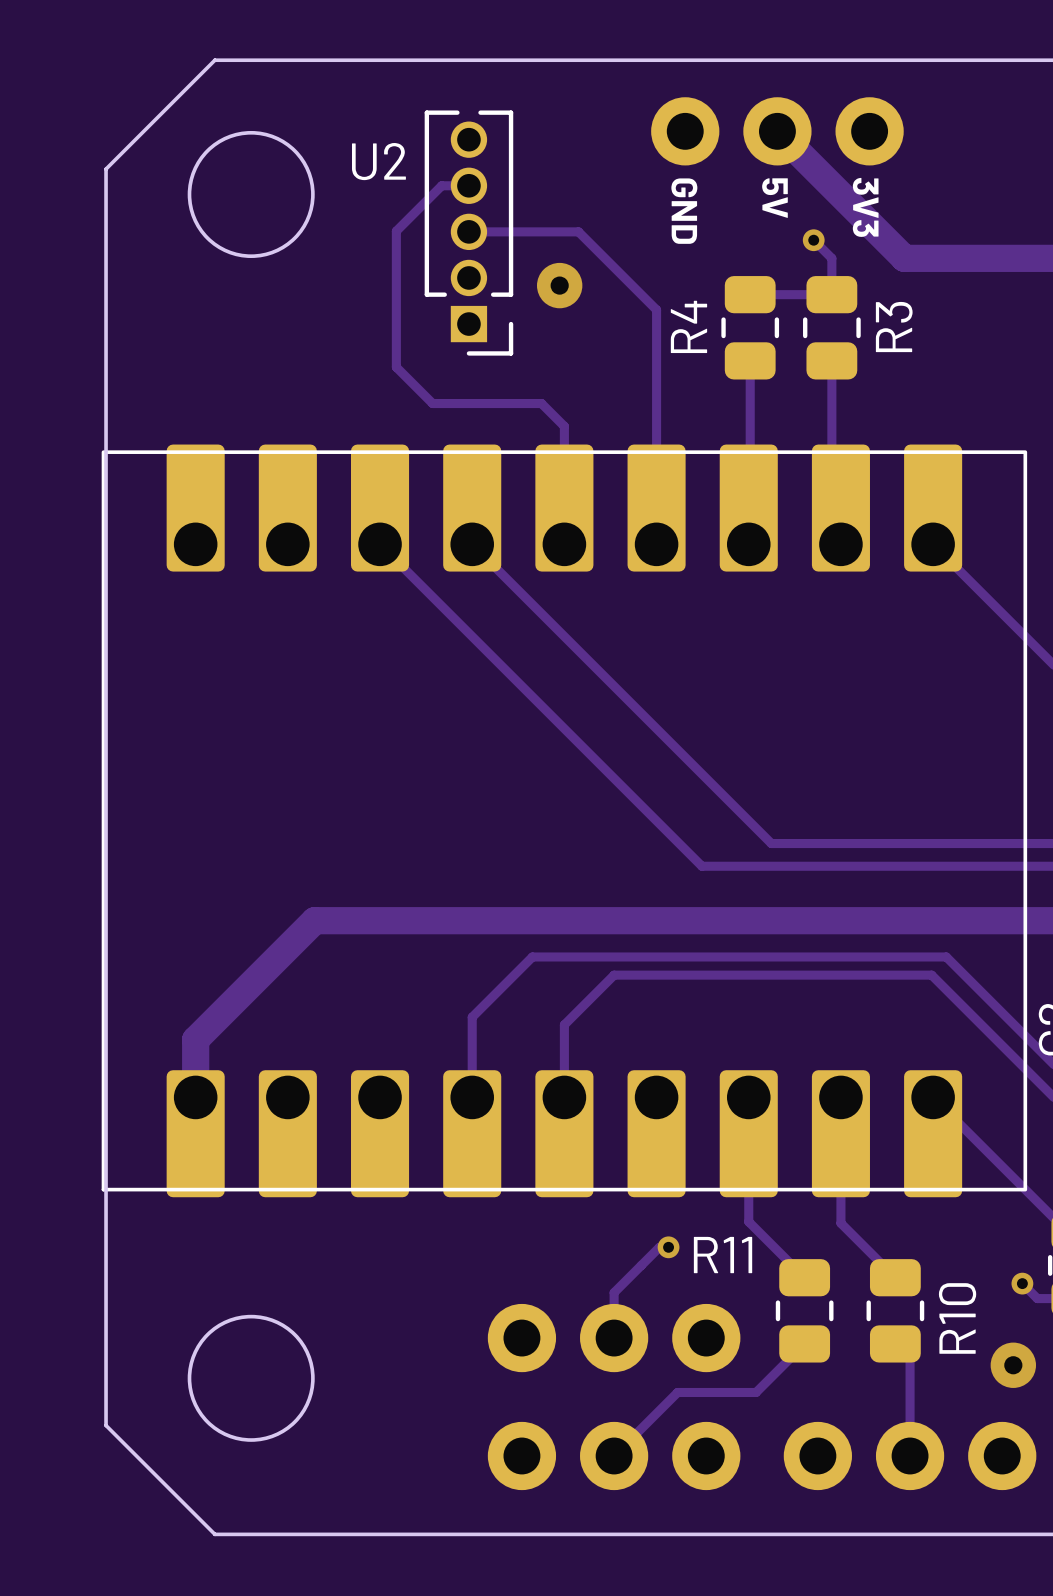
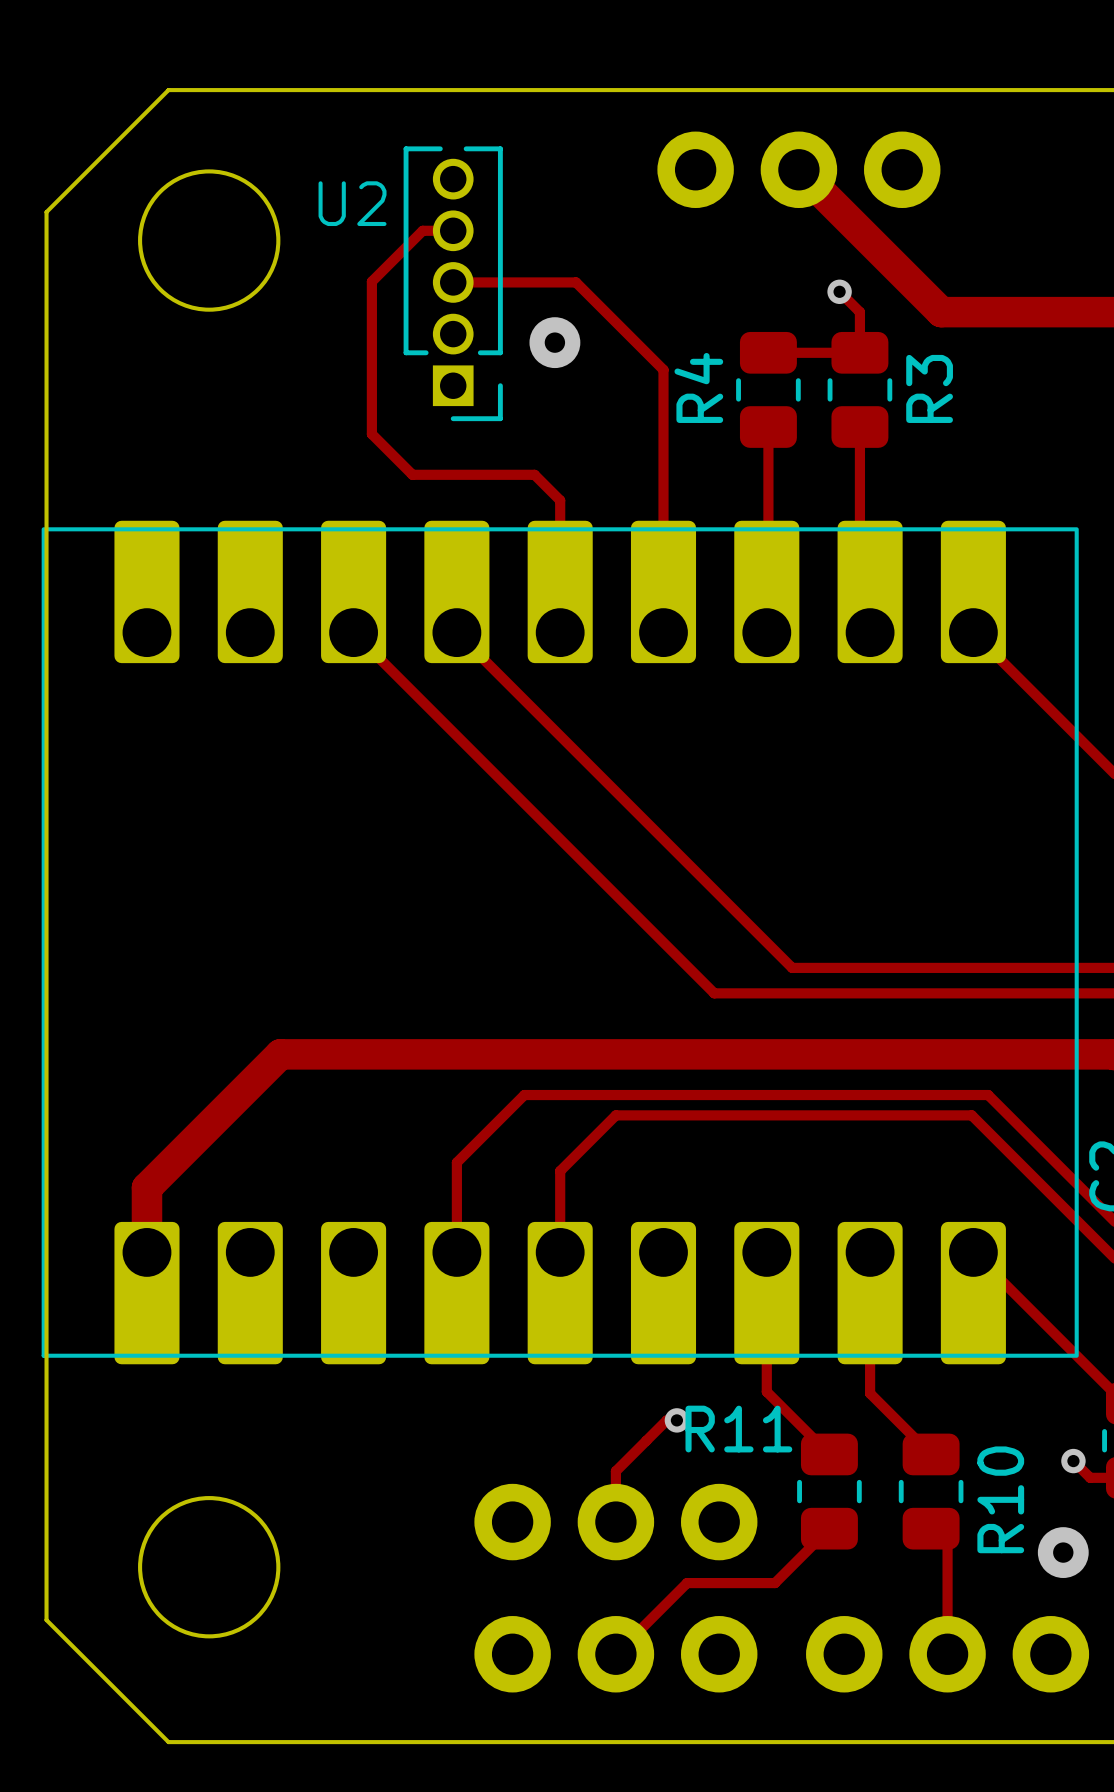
text: 5V (774, 198) -> none
text: 3V3 (865, 207) -> none
text: GND (684, 211) -> none

